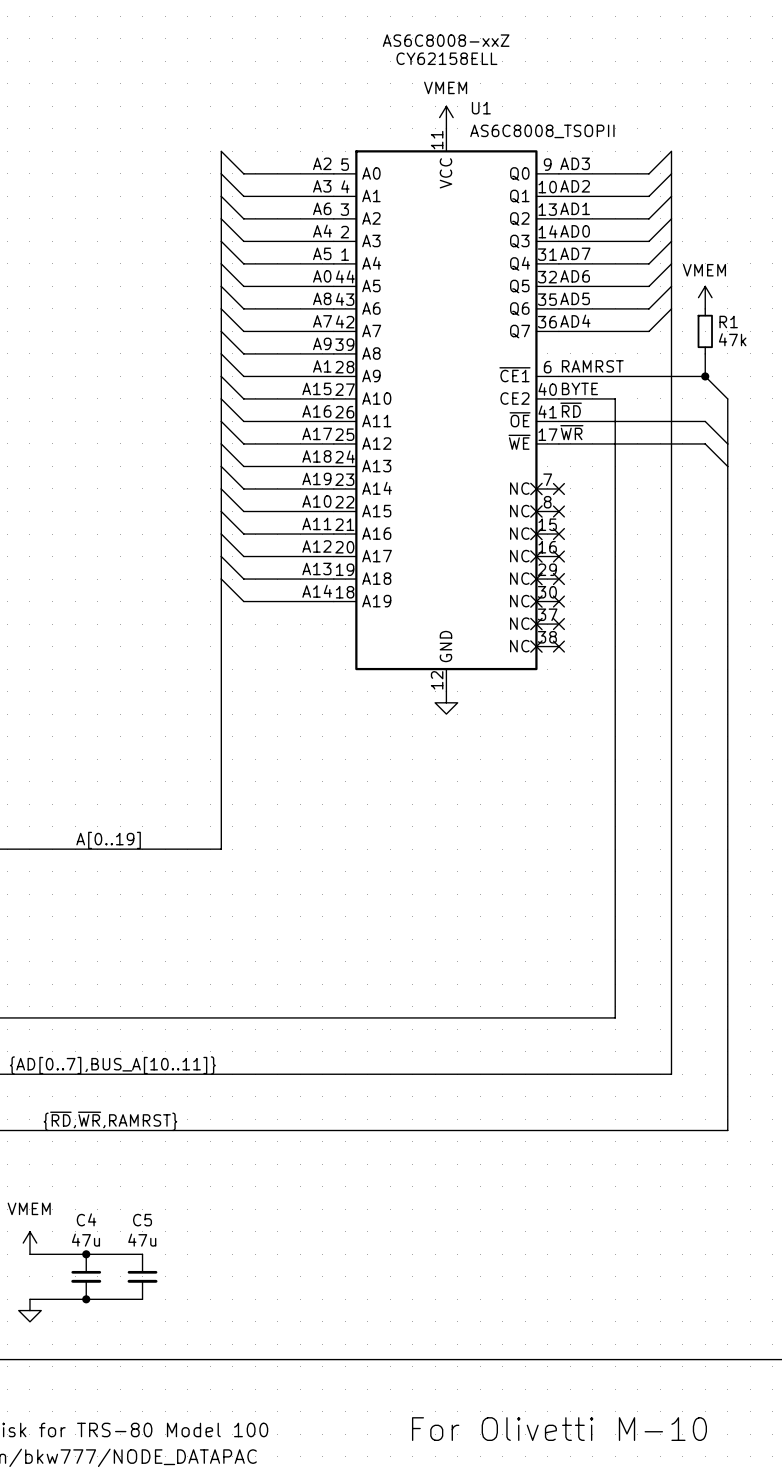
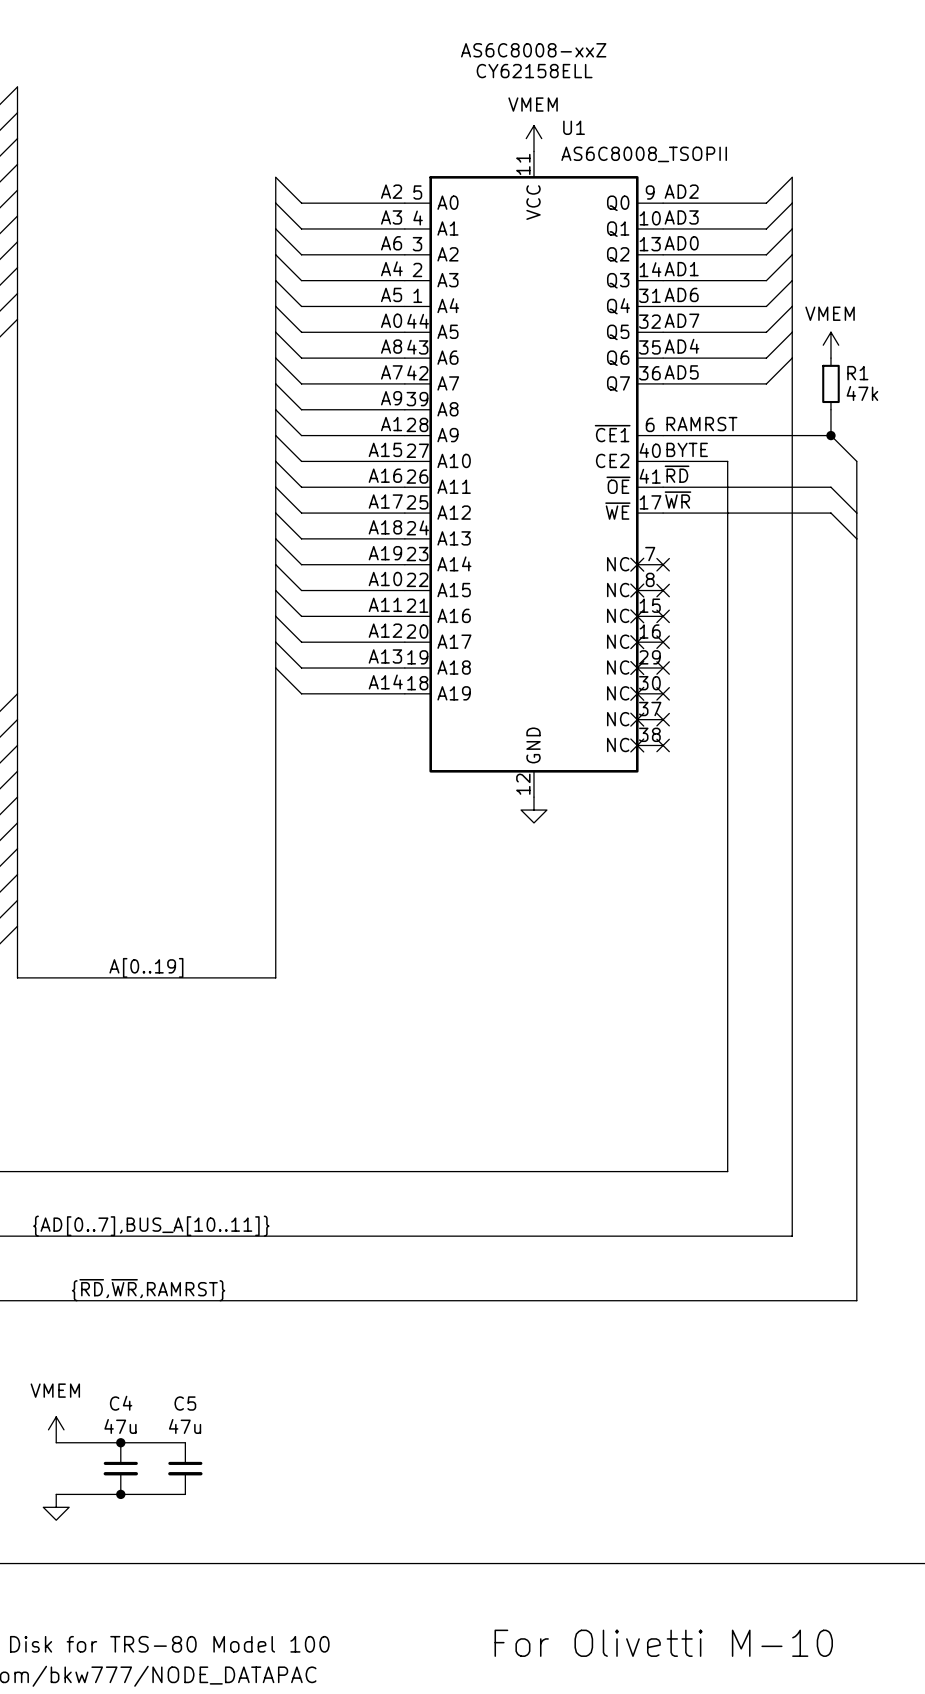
label: AD3 (575, 163) -> AD2 (681, 191)
label: AD2 (575, 186) -> AD3 (681, 217)
label: AD1 (575, 208) -> AD0 (681, 243)
label: AD0 (575, 231) -> AD1 (681, 269)
label: AD7 (575, 253) -> AD6 (681, 294)
label: AD6 (575, 276) -> AD7 (681, 320)
label: AD5 (575, 298) -> AD4 (681, 346)
label: AD4 (575, 321) -> AD5 (681, 372)

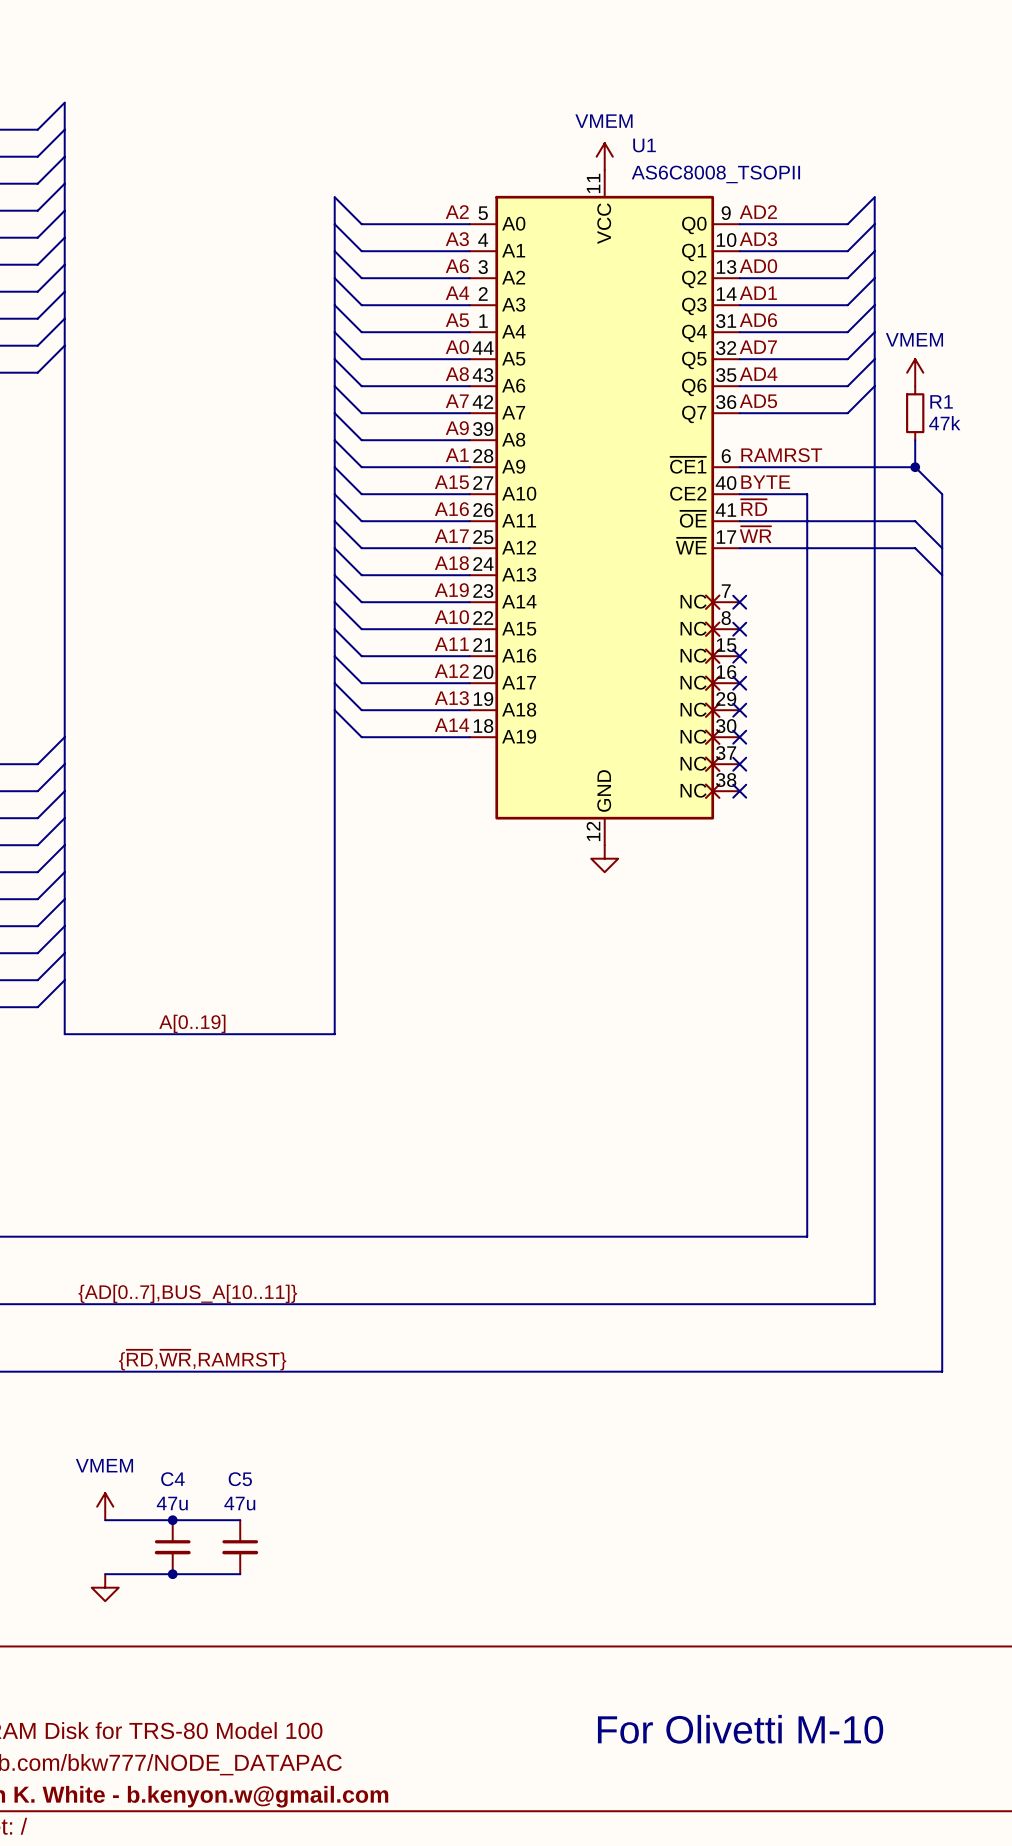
text: AS6C8008-xxZ (533, 50) -> none
text: CY62158ELL (534, 71) -> none

